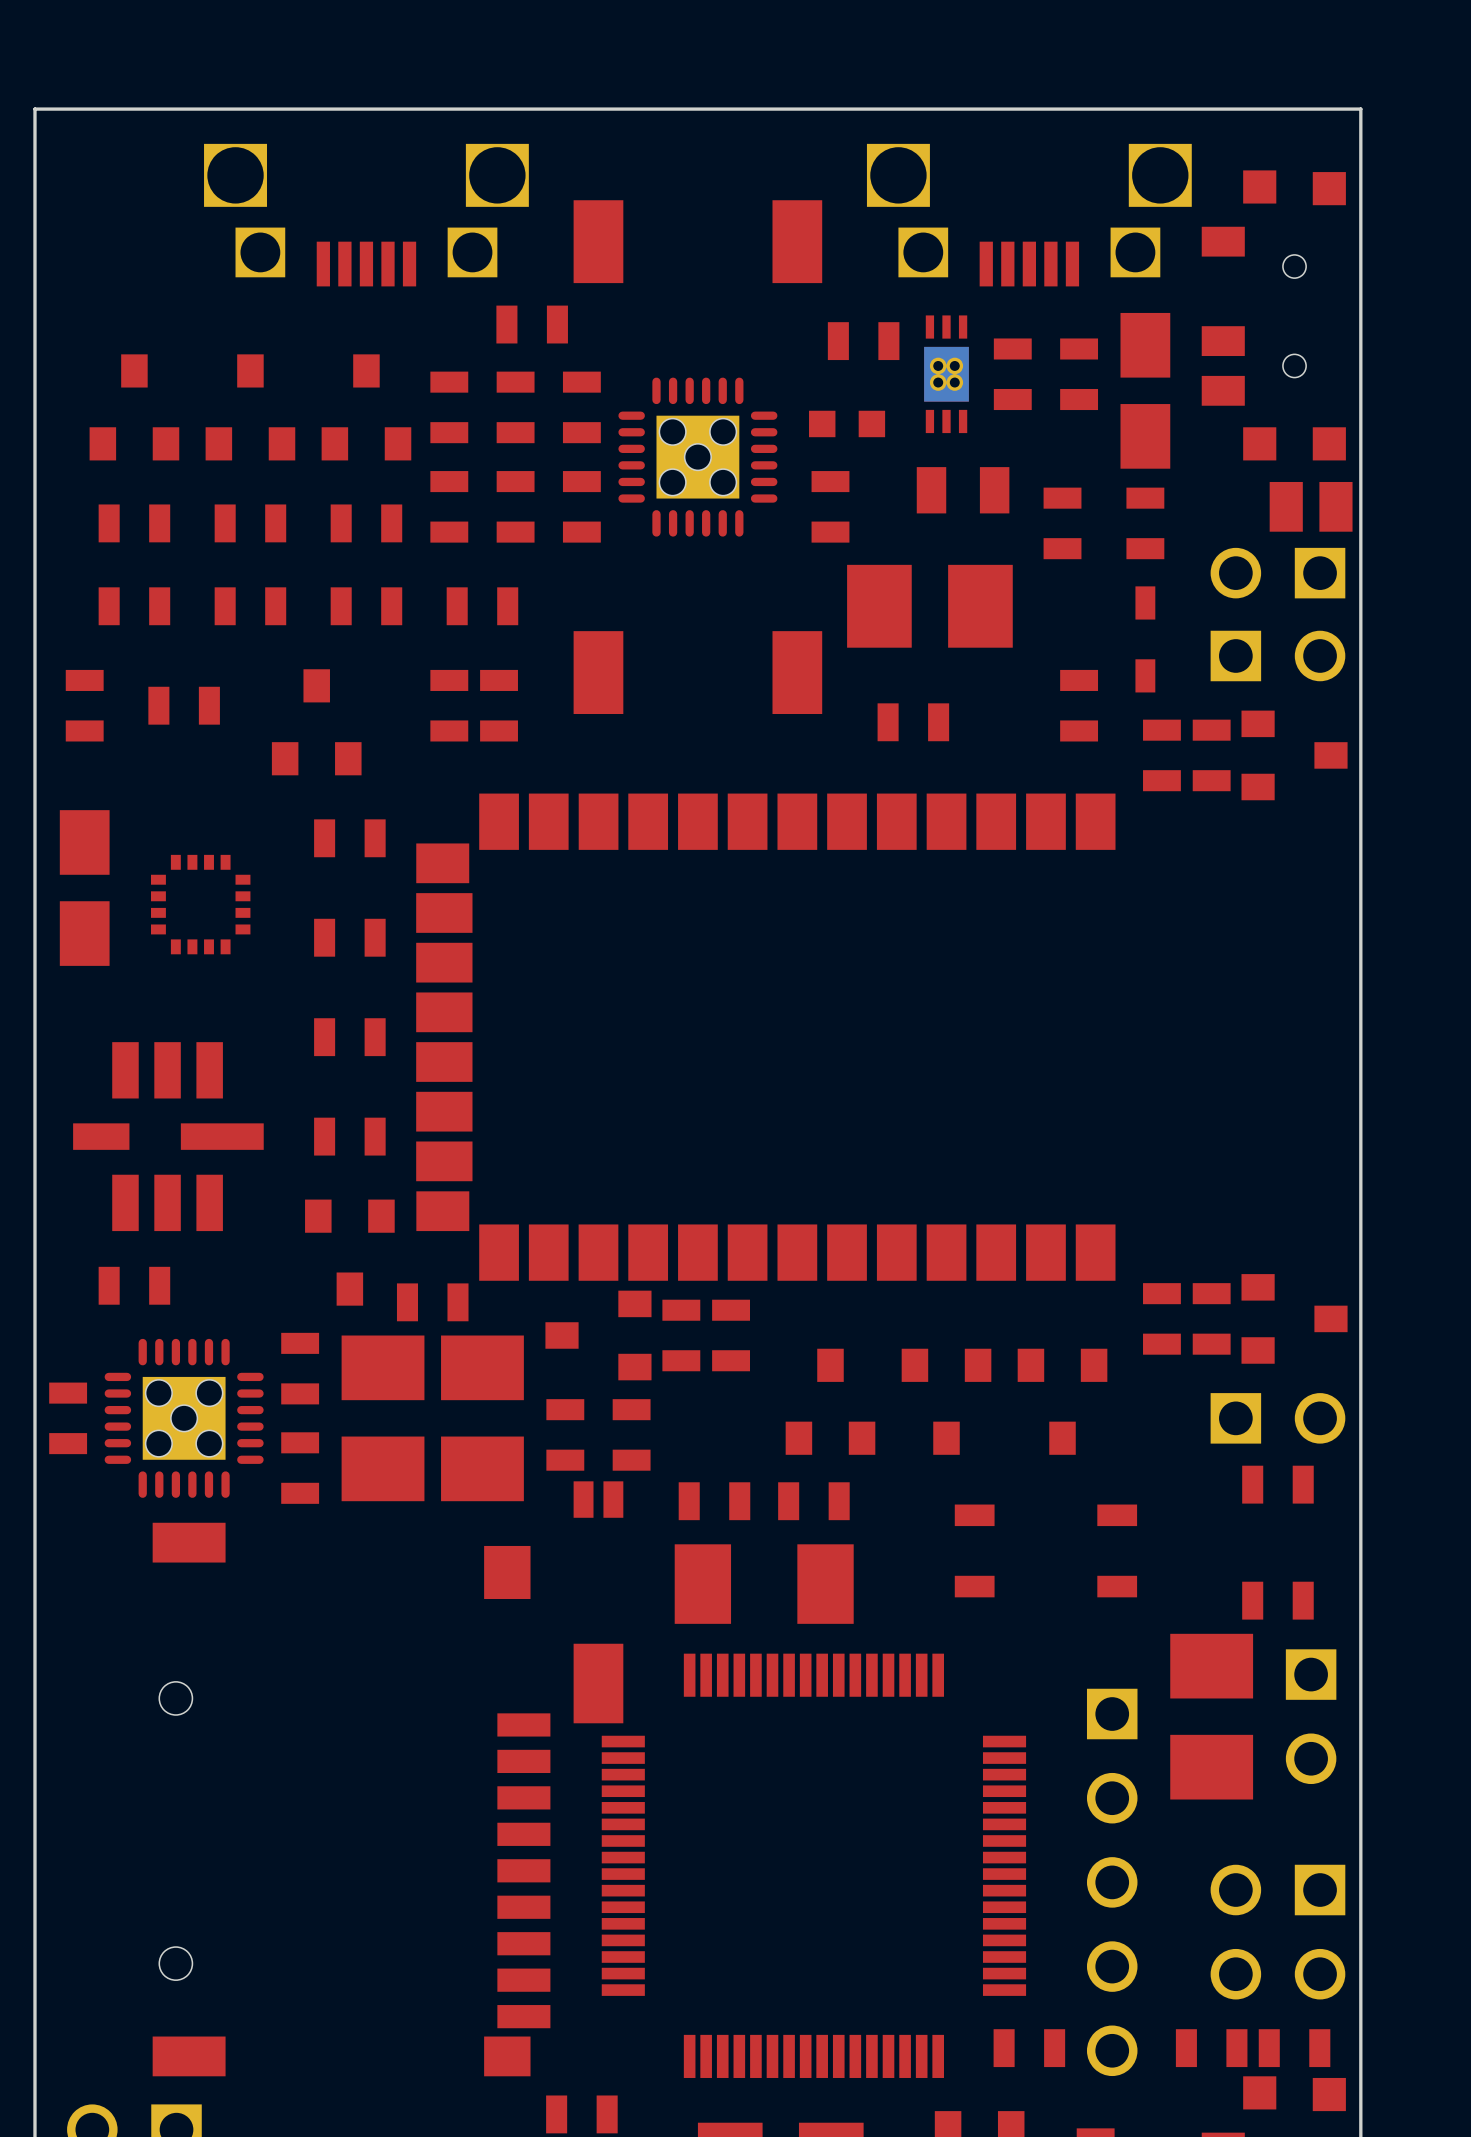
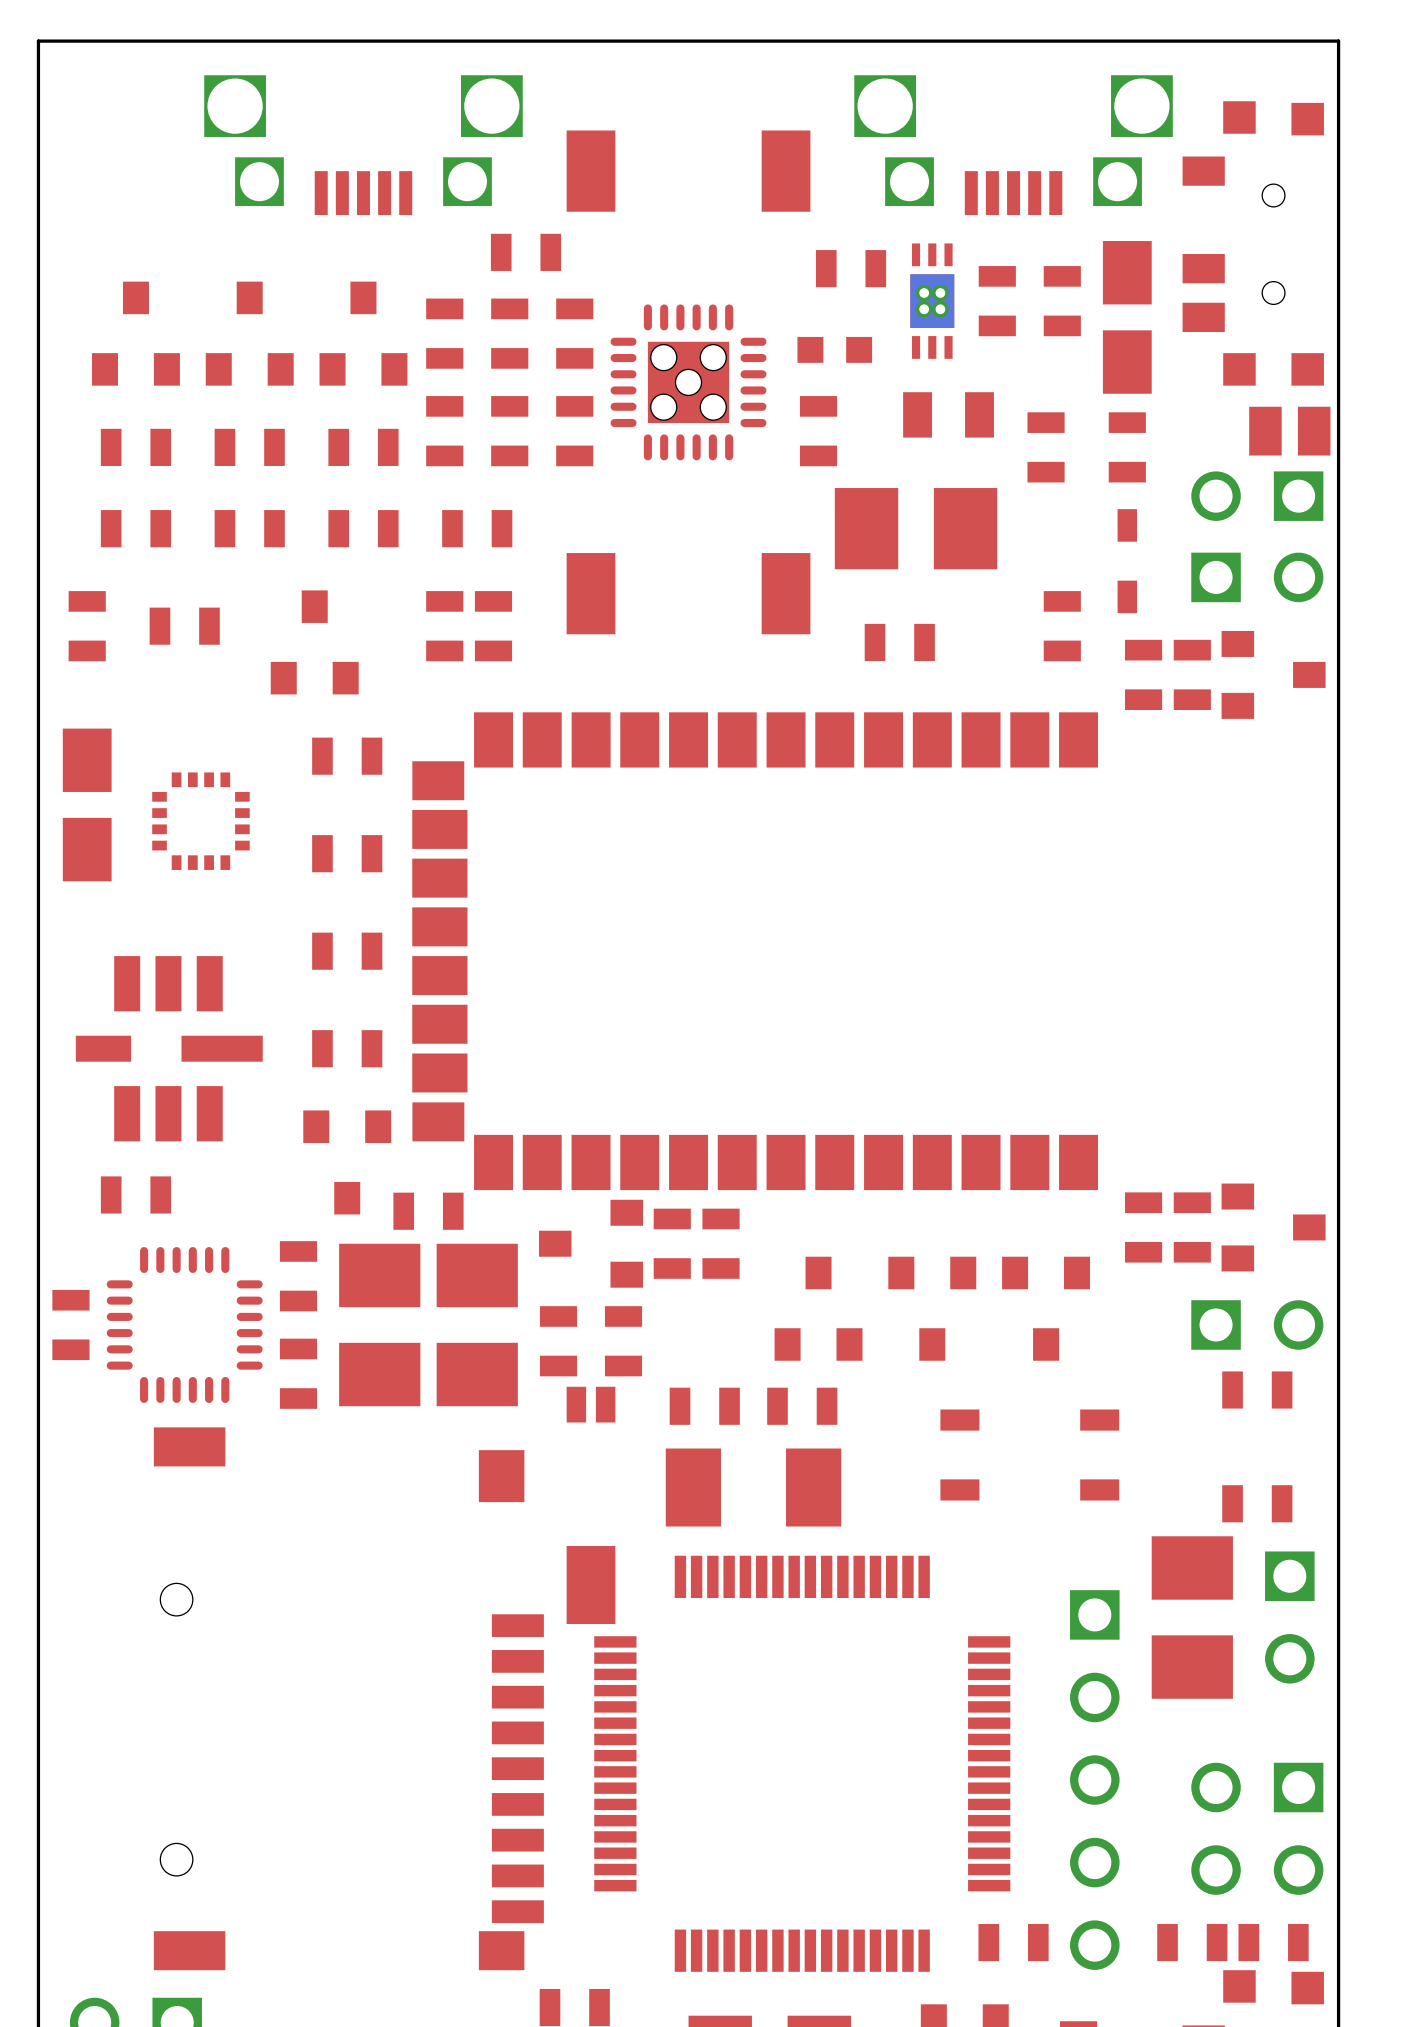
part footprint: [618, 377, 778, 537] -> [610, 304, 767, 461]
part footprint: [104, 1338, 264, 1498] -> [106, 1247, 263, 1403]

